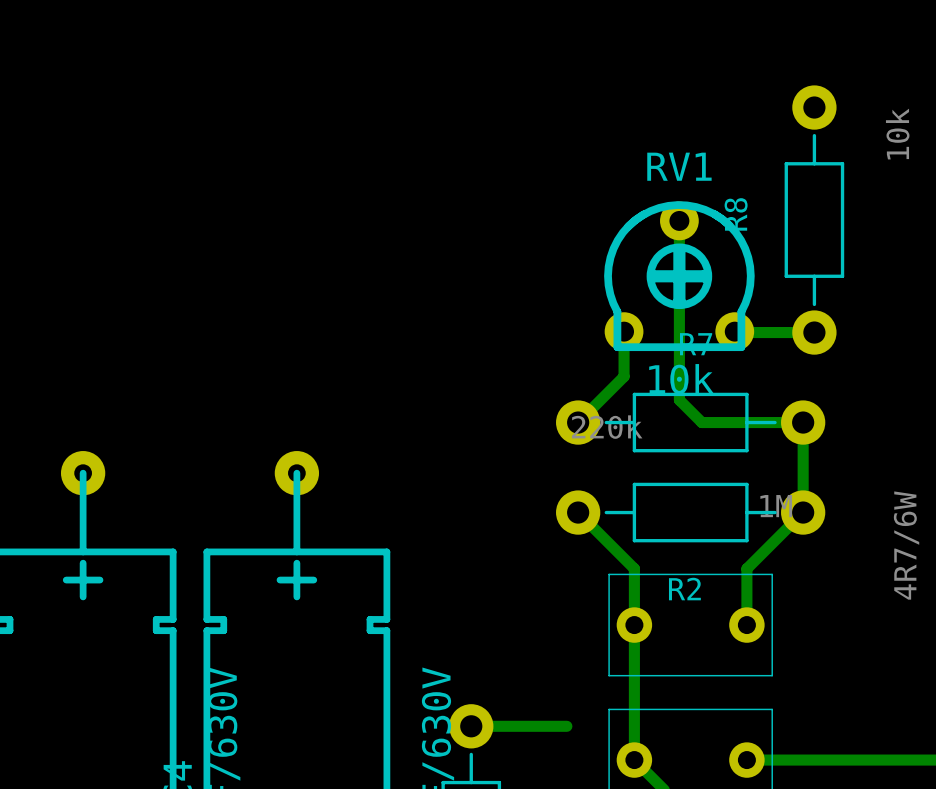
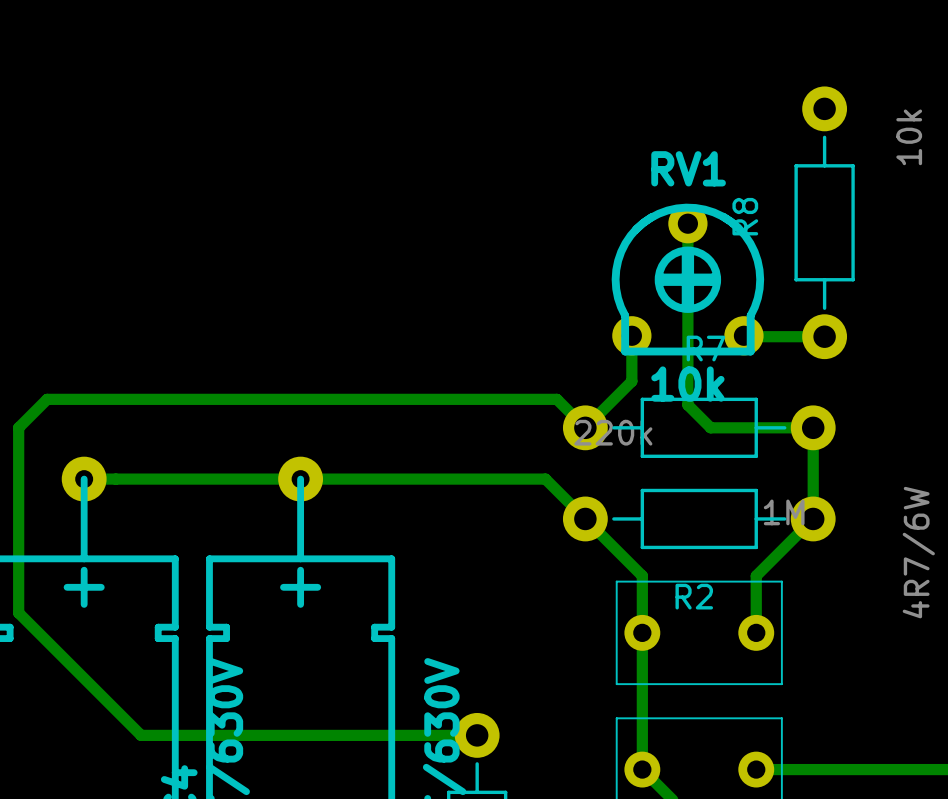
bottom track: none -> (84, 479) (545, 479) (585, 518)
bottom track: (471, 726) (566, 726) -> (477, 735) (141, 735) (18, 612) (18, 427) (47, 399) (556, 399) (585, 427)

